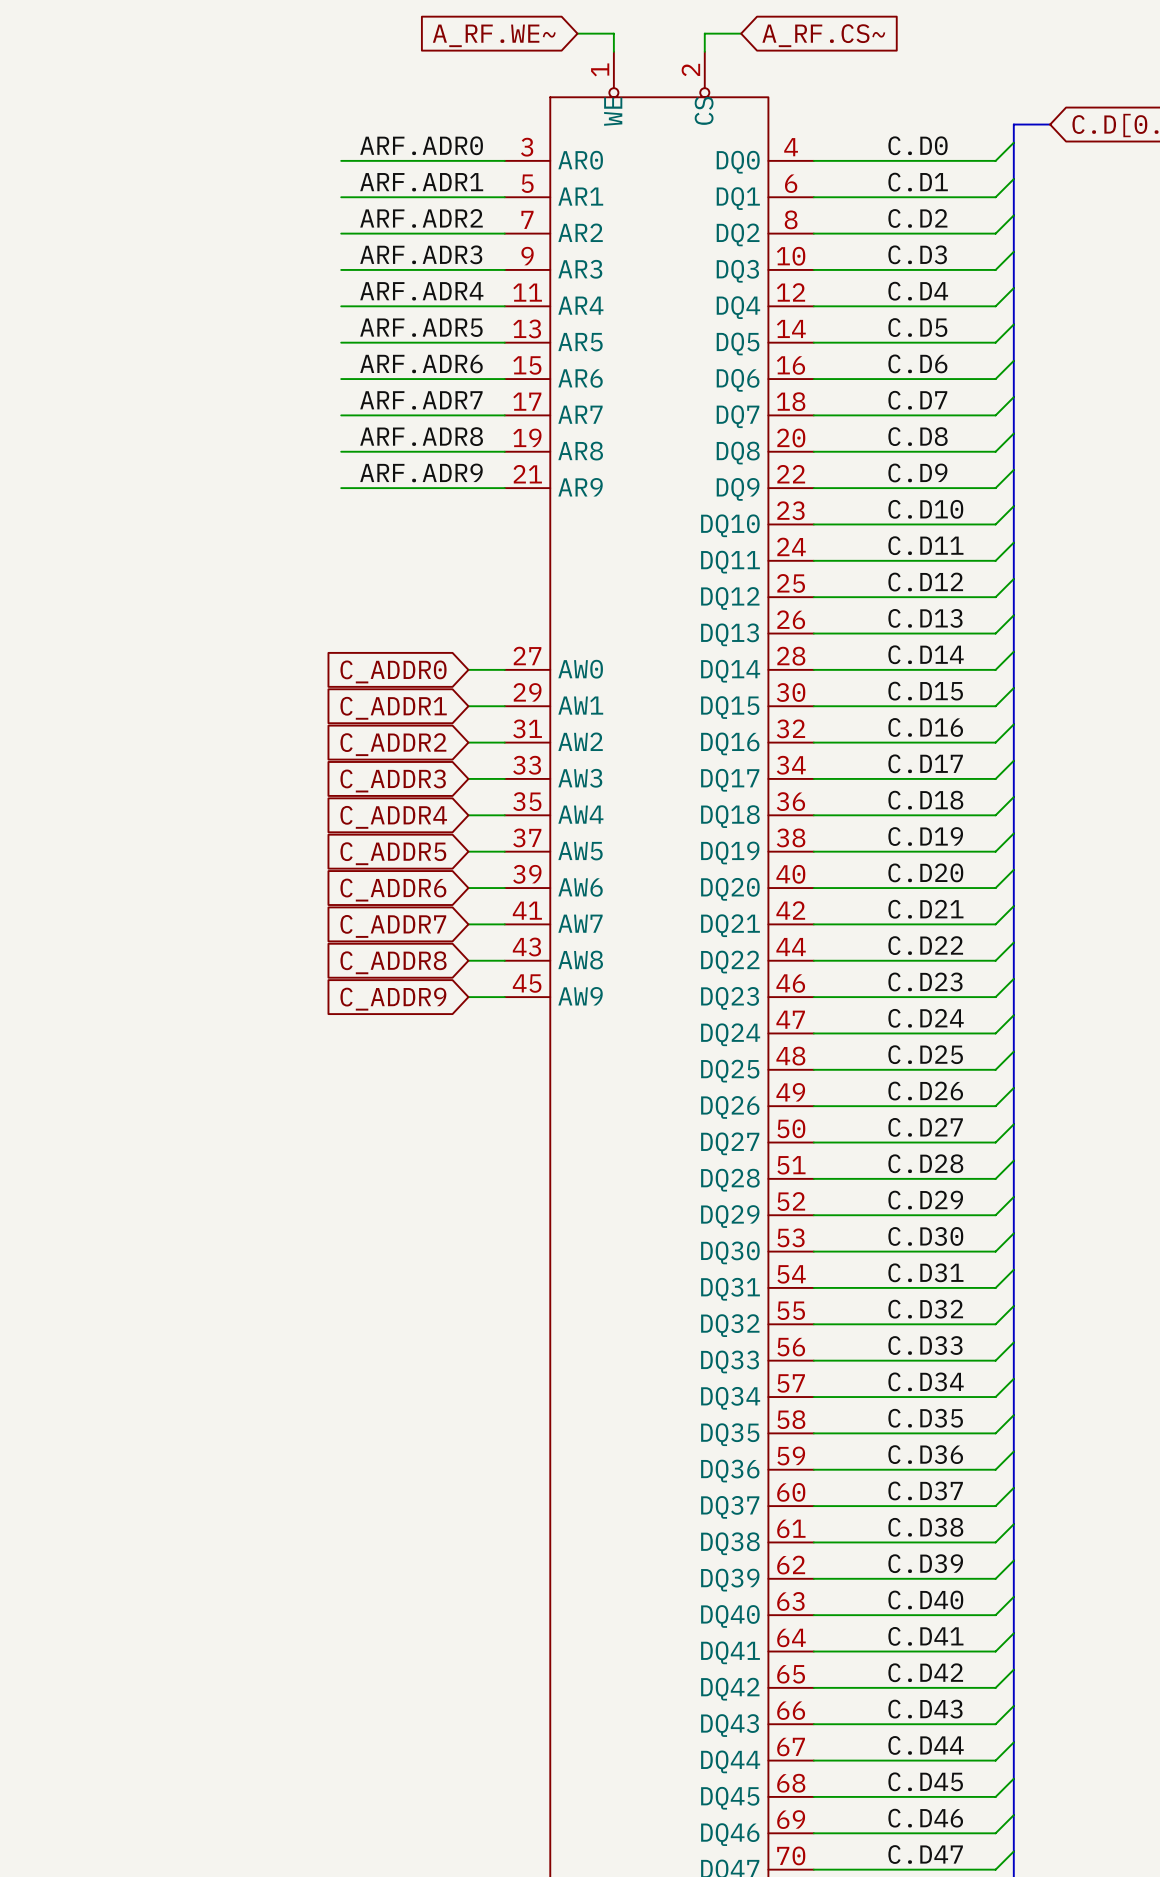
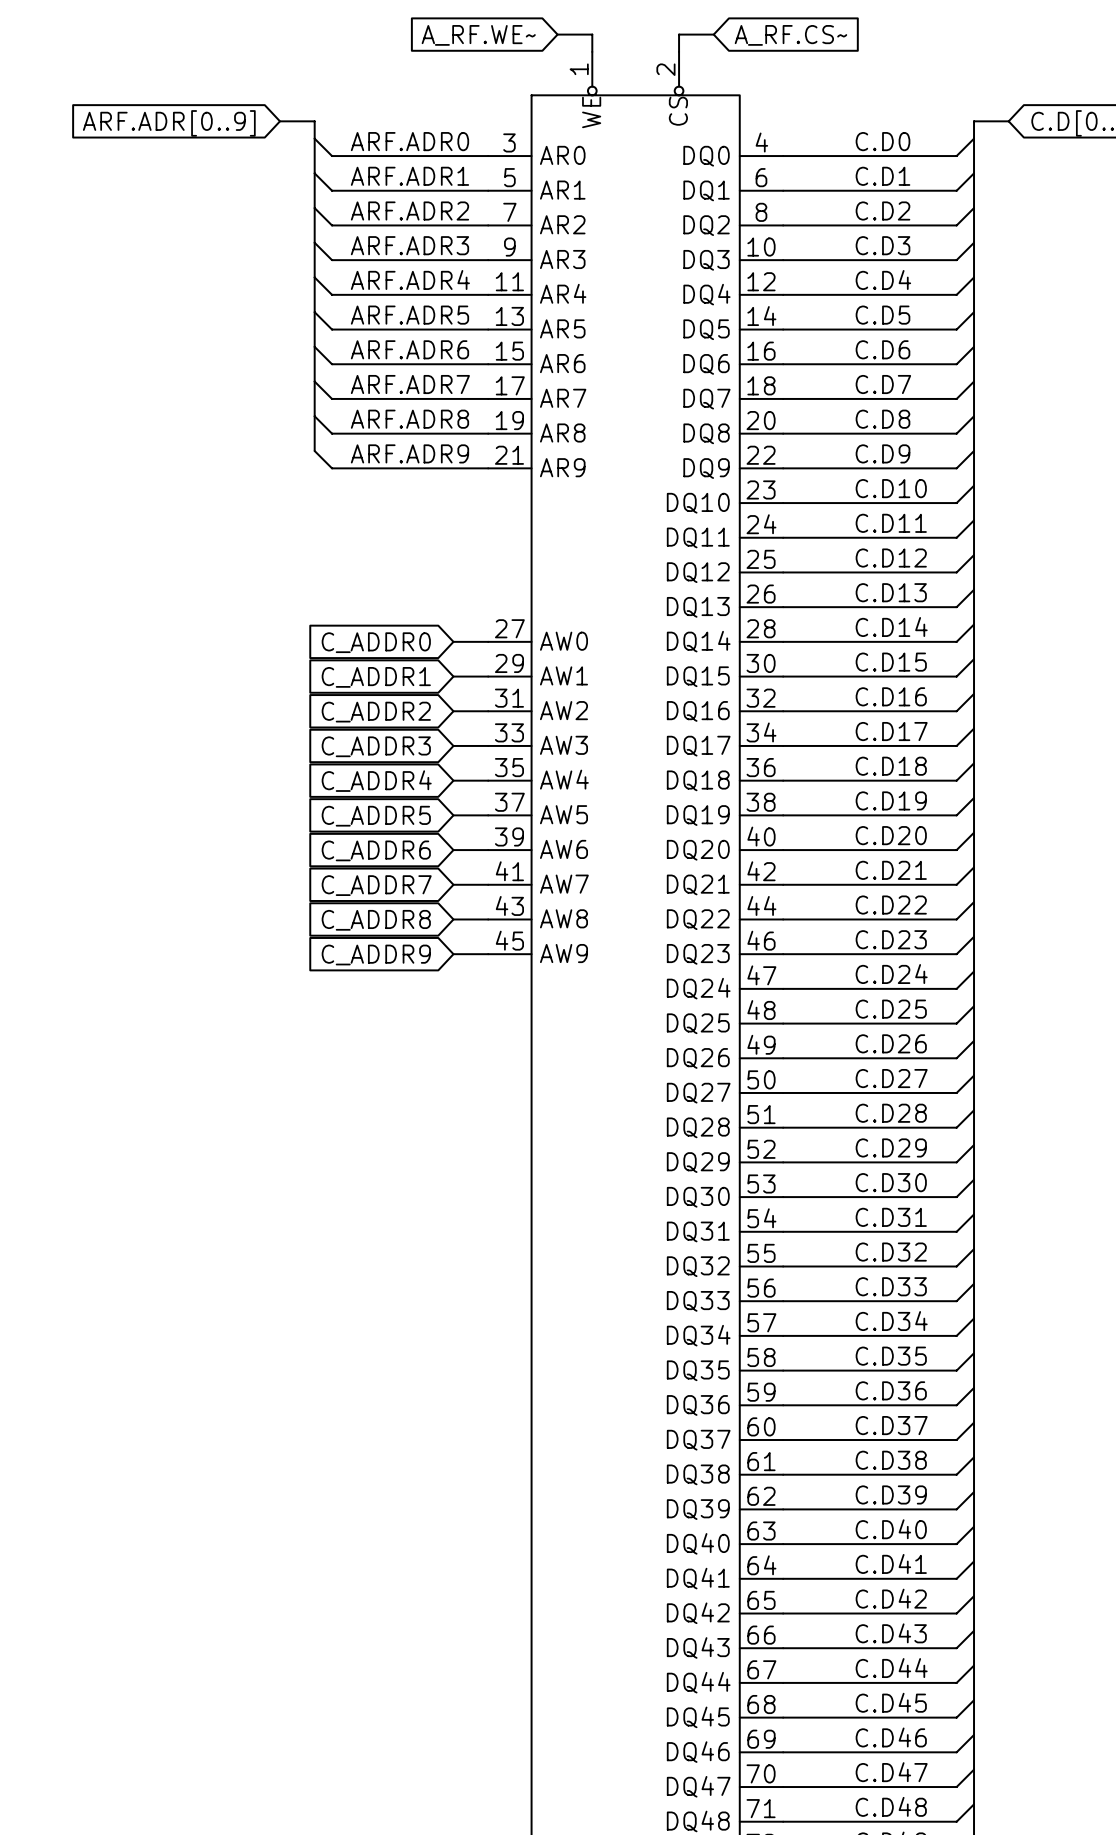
bus: none -> (279, 121) (314, 121) (314, 451)
global label: none -> ARF.ADR[0..9] (169, 123)
wire: none -> (314, 138) (332, 156)
wire: none -> (314, 173) (332, 190)
wire: none -> (314, 208) (332, 225)
wire: none -> (314, 242) (332, 260)
wire: none -> (314, 277) (332, 294)
wire: none -> (314, 312) (332, 329)
wire: none -> (314, 346) (332, 364)
wire: none -> (314, 381) (332, 398)
wire: none -> (314, 416) (332, 433)
wire: none -> (314, 451) (332, 468)

